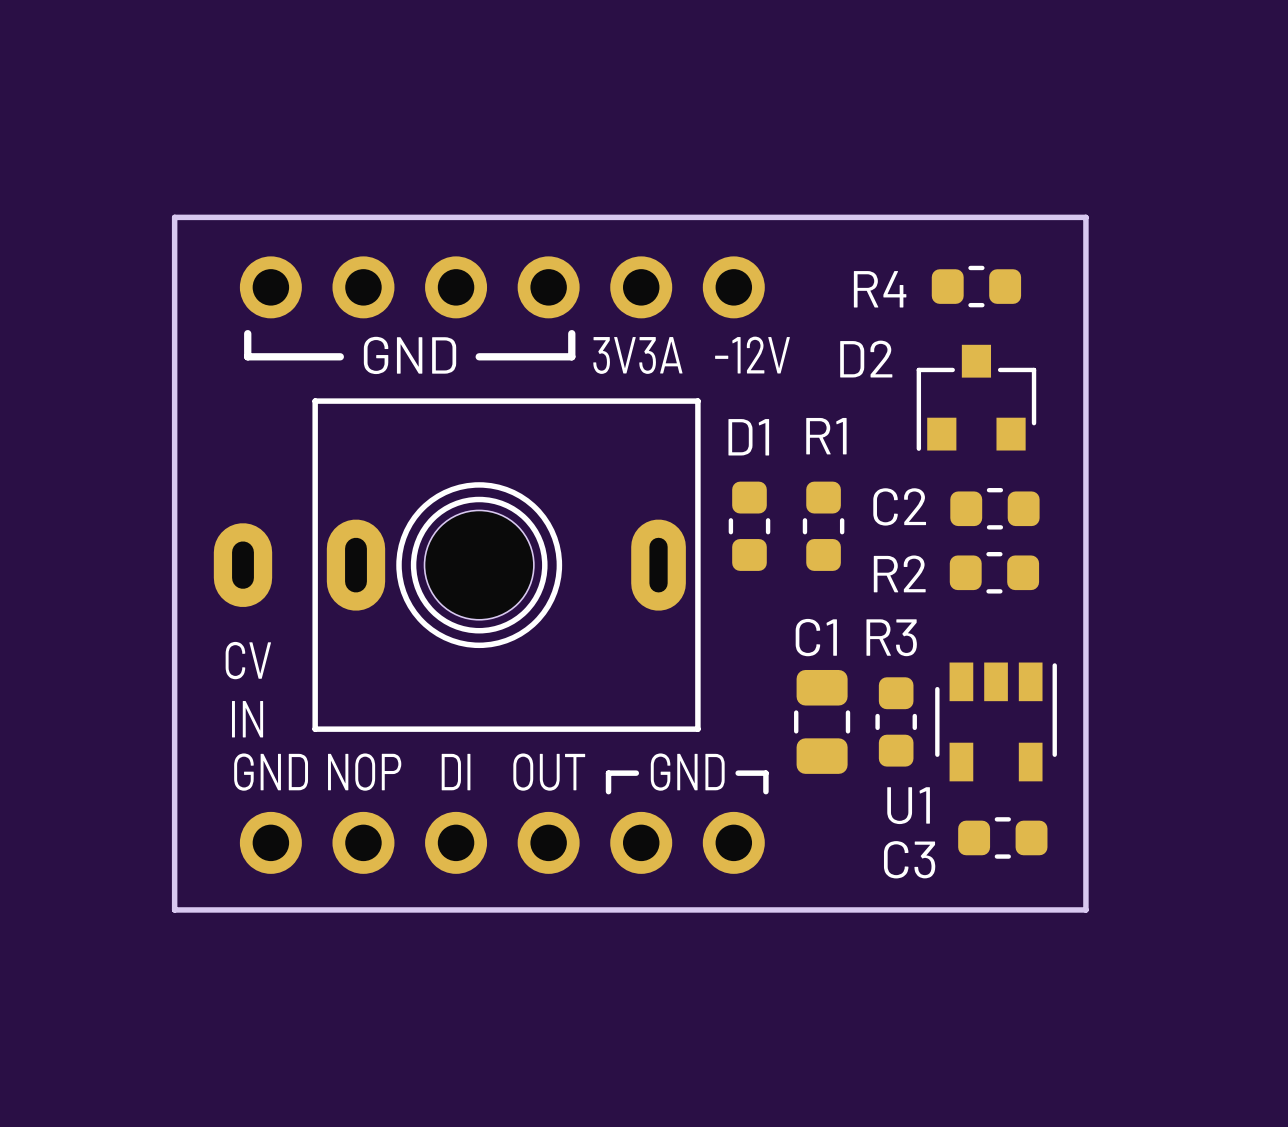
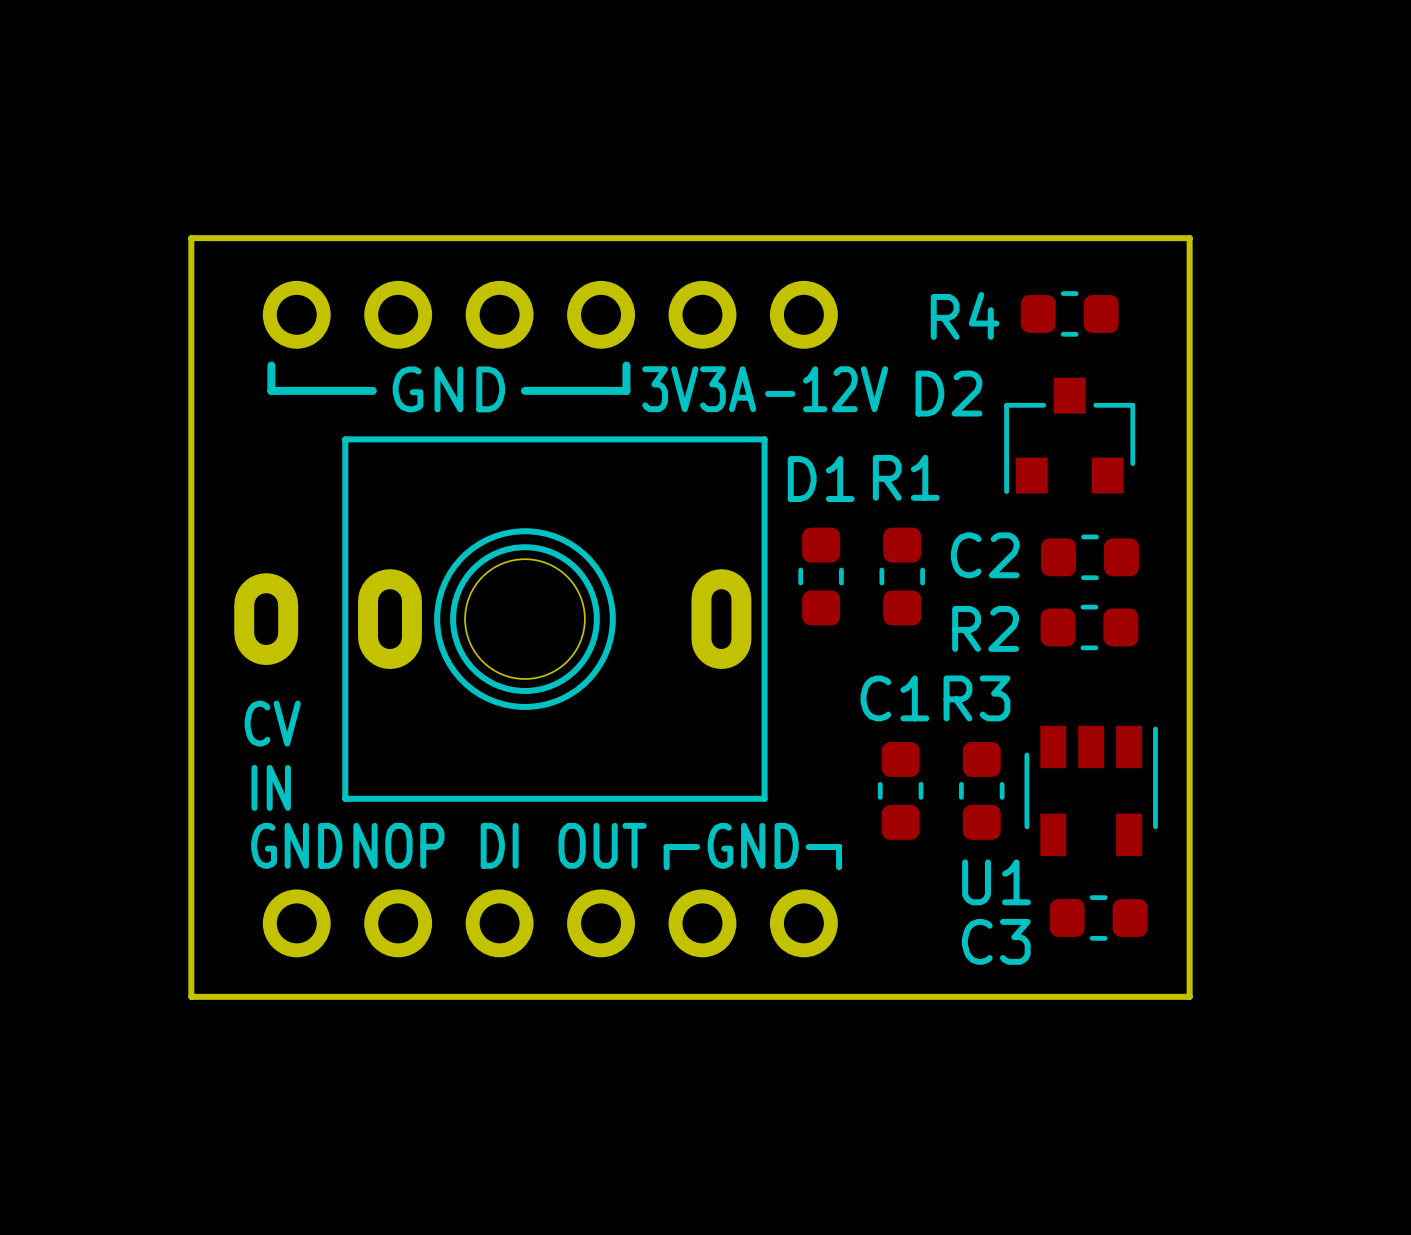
C1 footprint: [794, 669, 851, 774] -> [877, 741, 924, 840]

